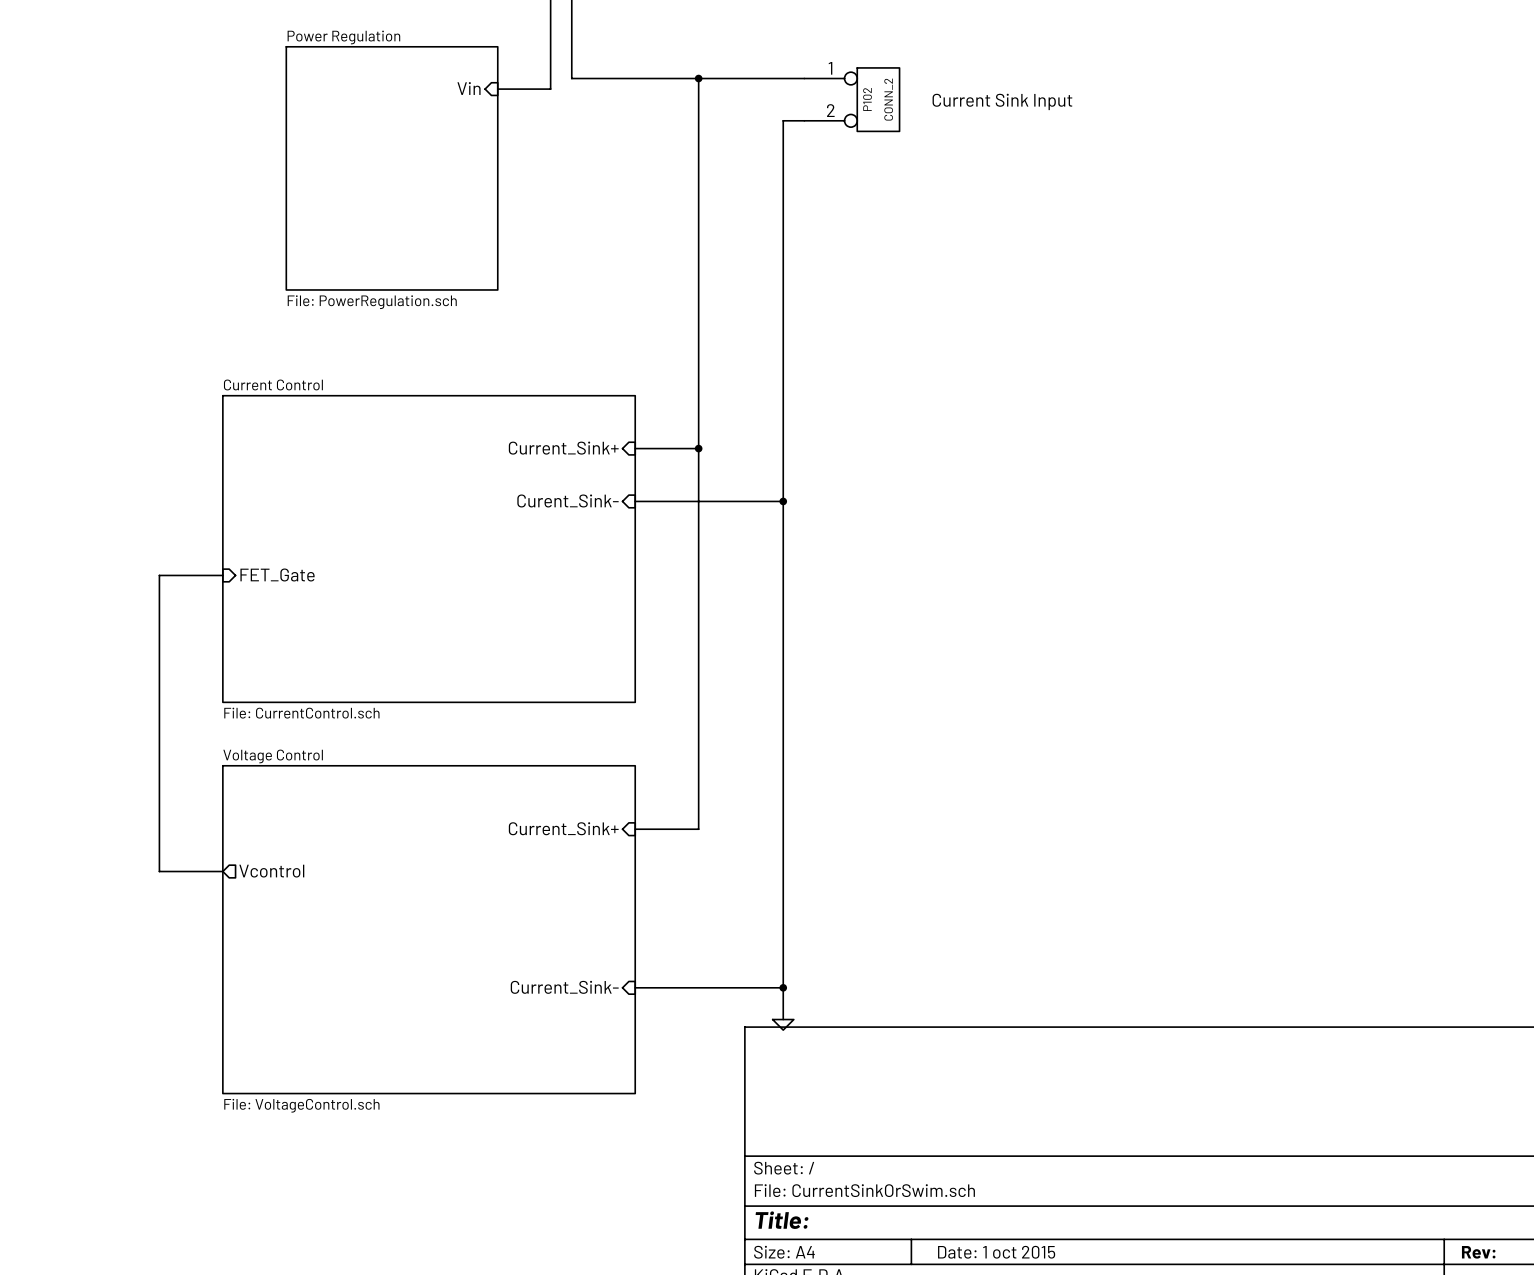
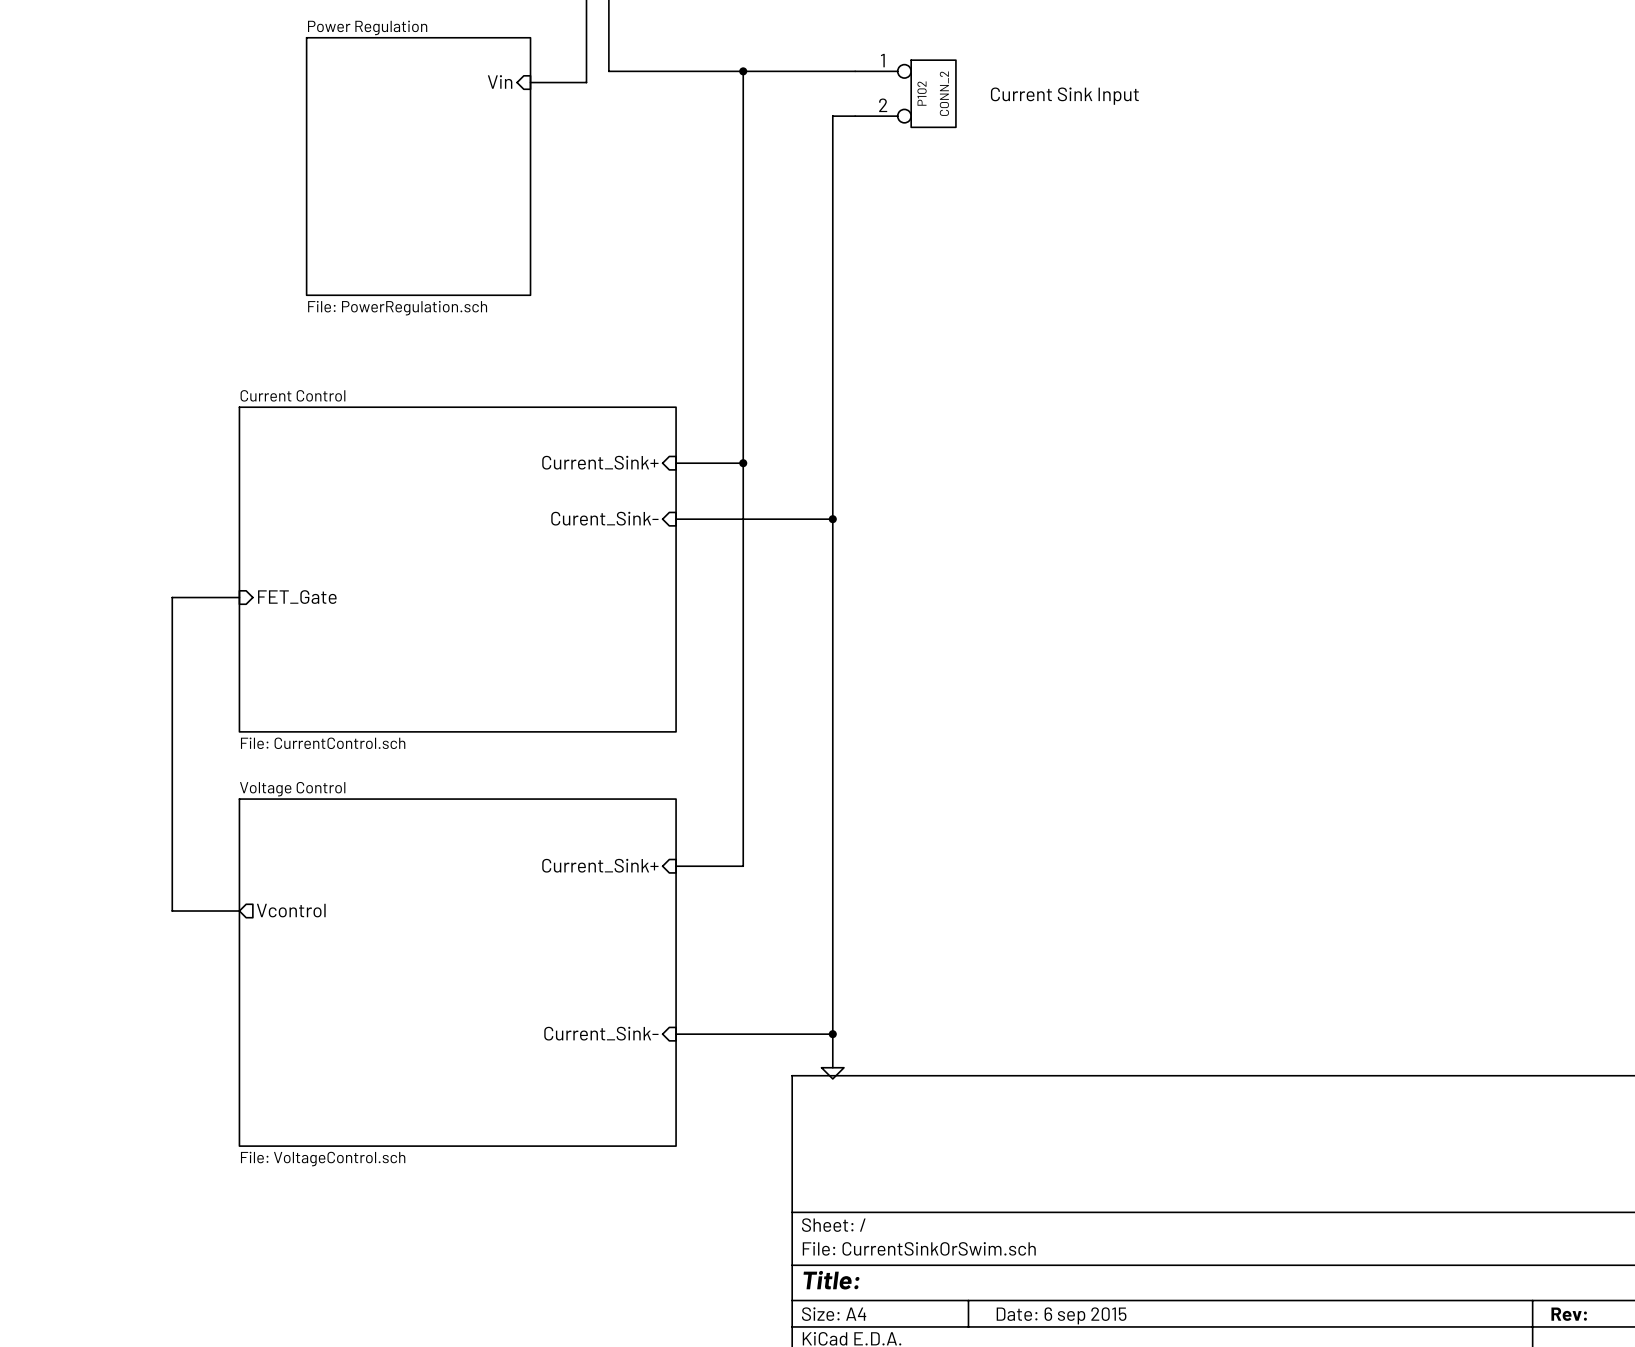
title block: Date: 1 oct 2015 (996, 1252) -> Date: 6 sep 2015 (1061, 1315)

